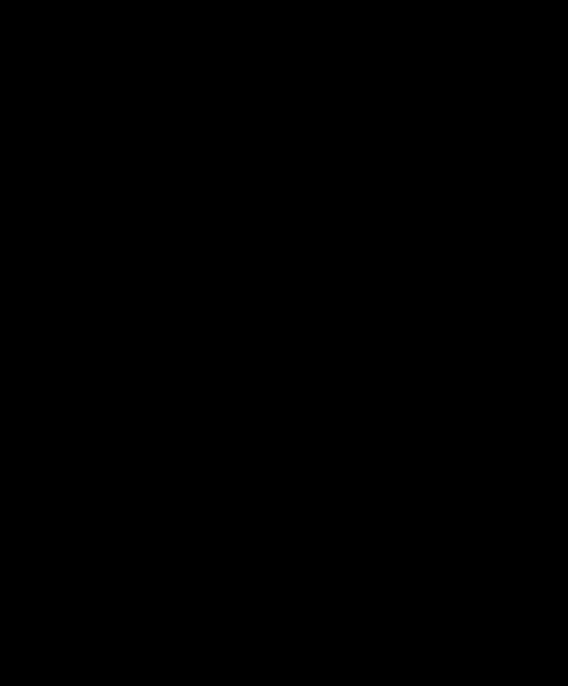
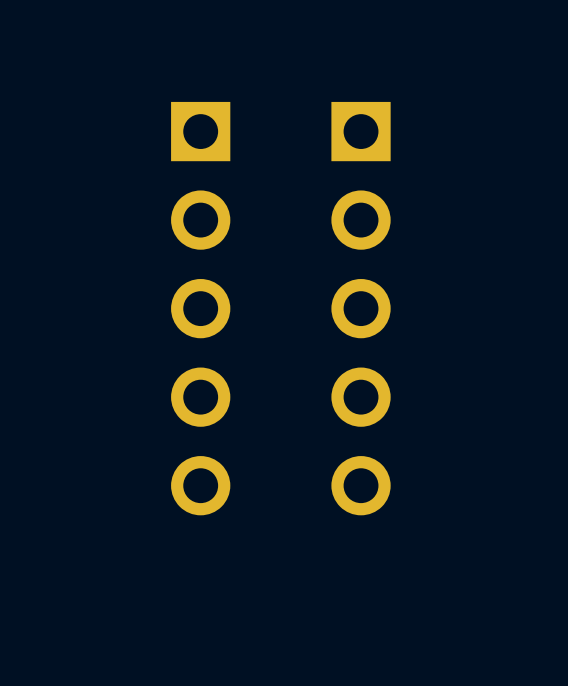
part: none -> (200, 308)
part: none -> (361, 308)

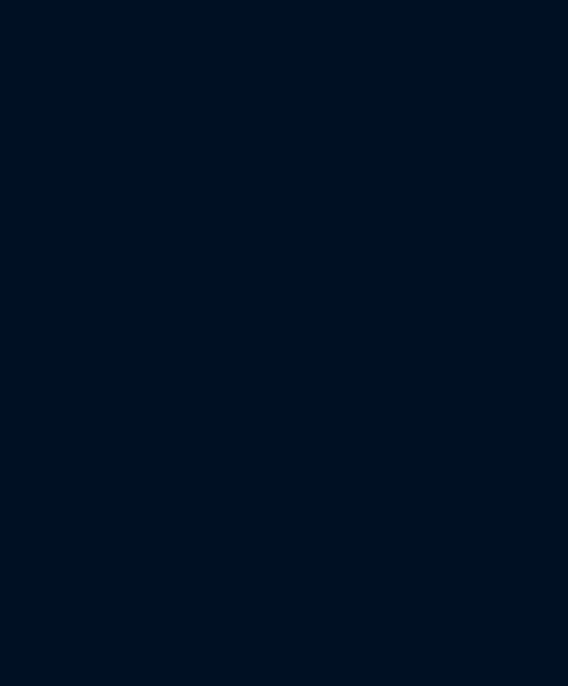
part: (200, 308) -> none
part: (361, 308) -> none

